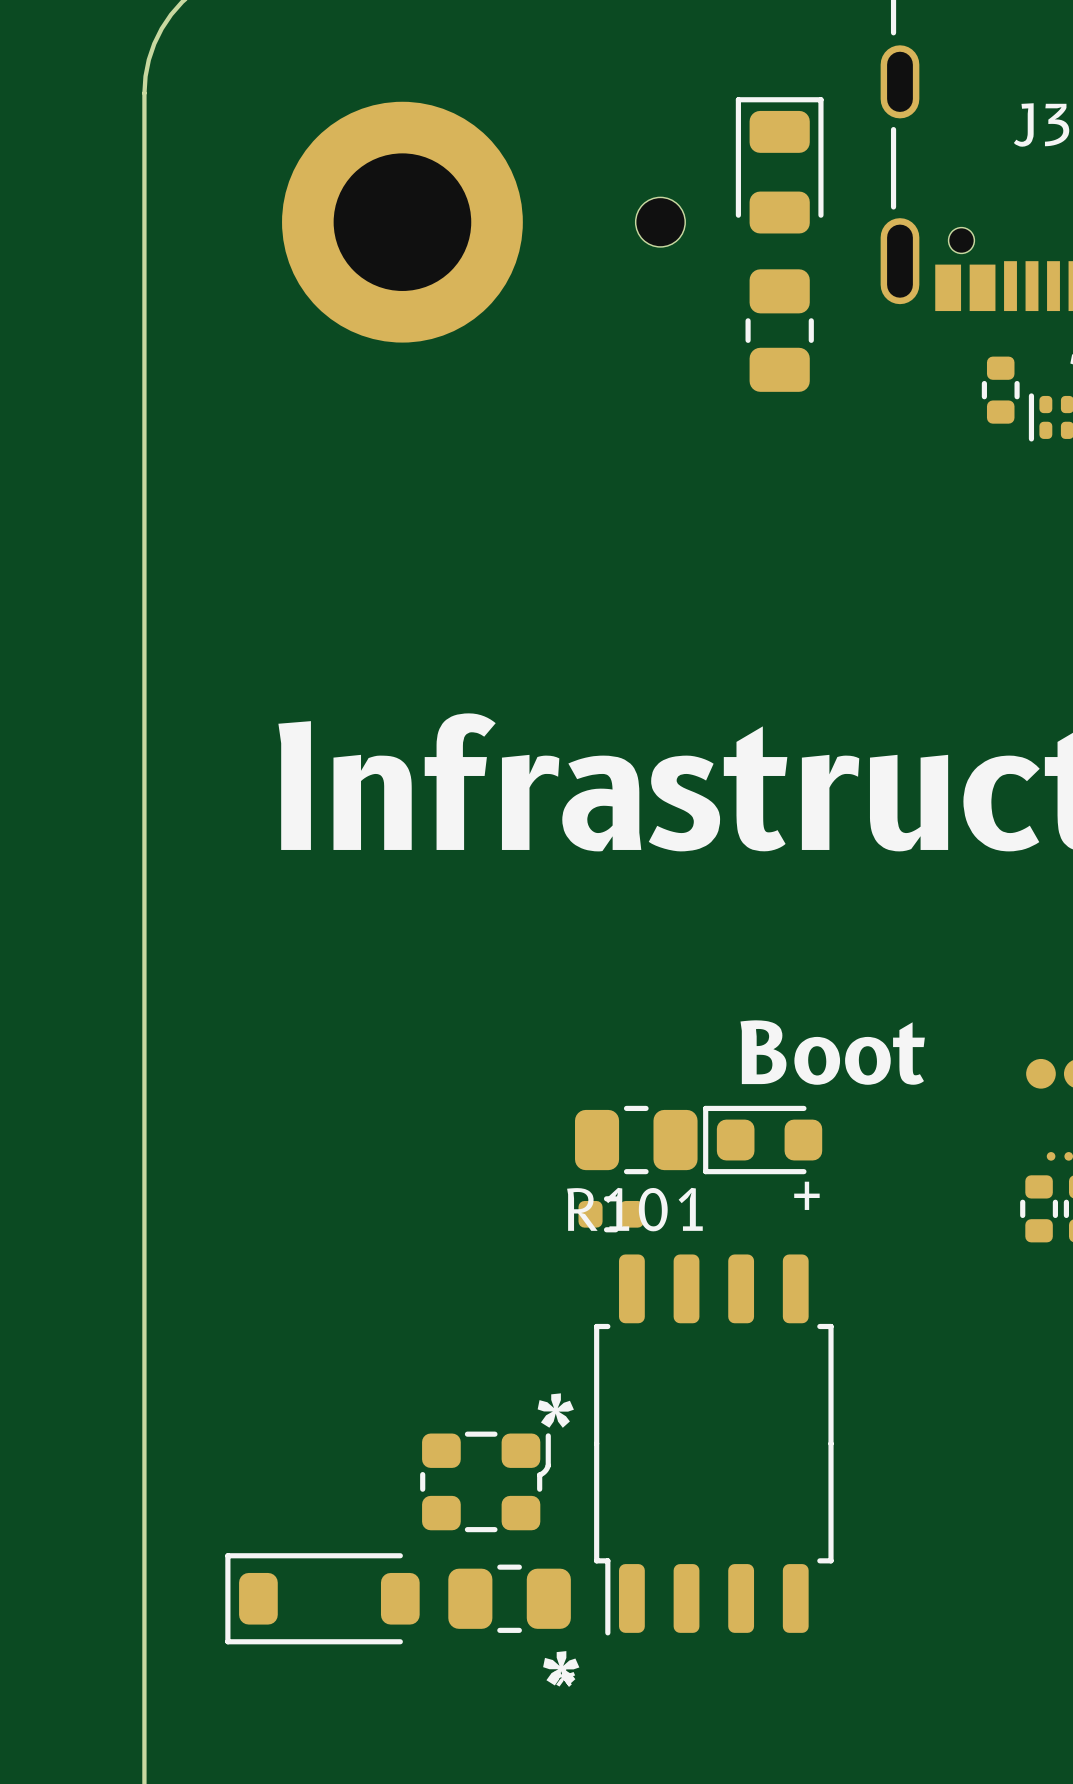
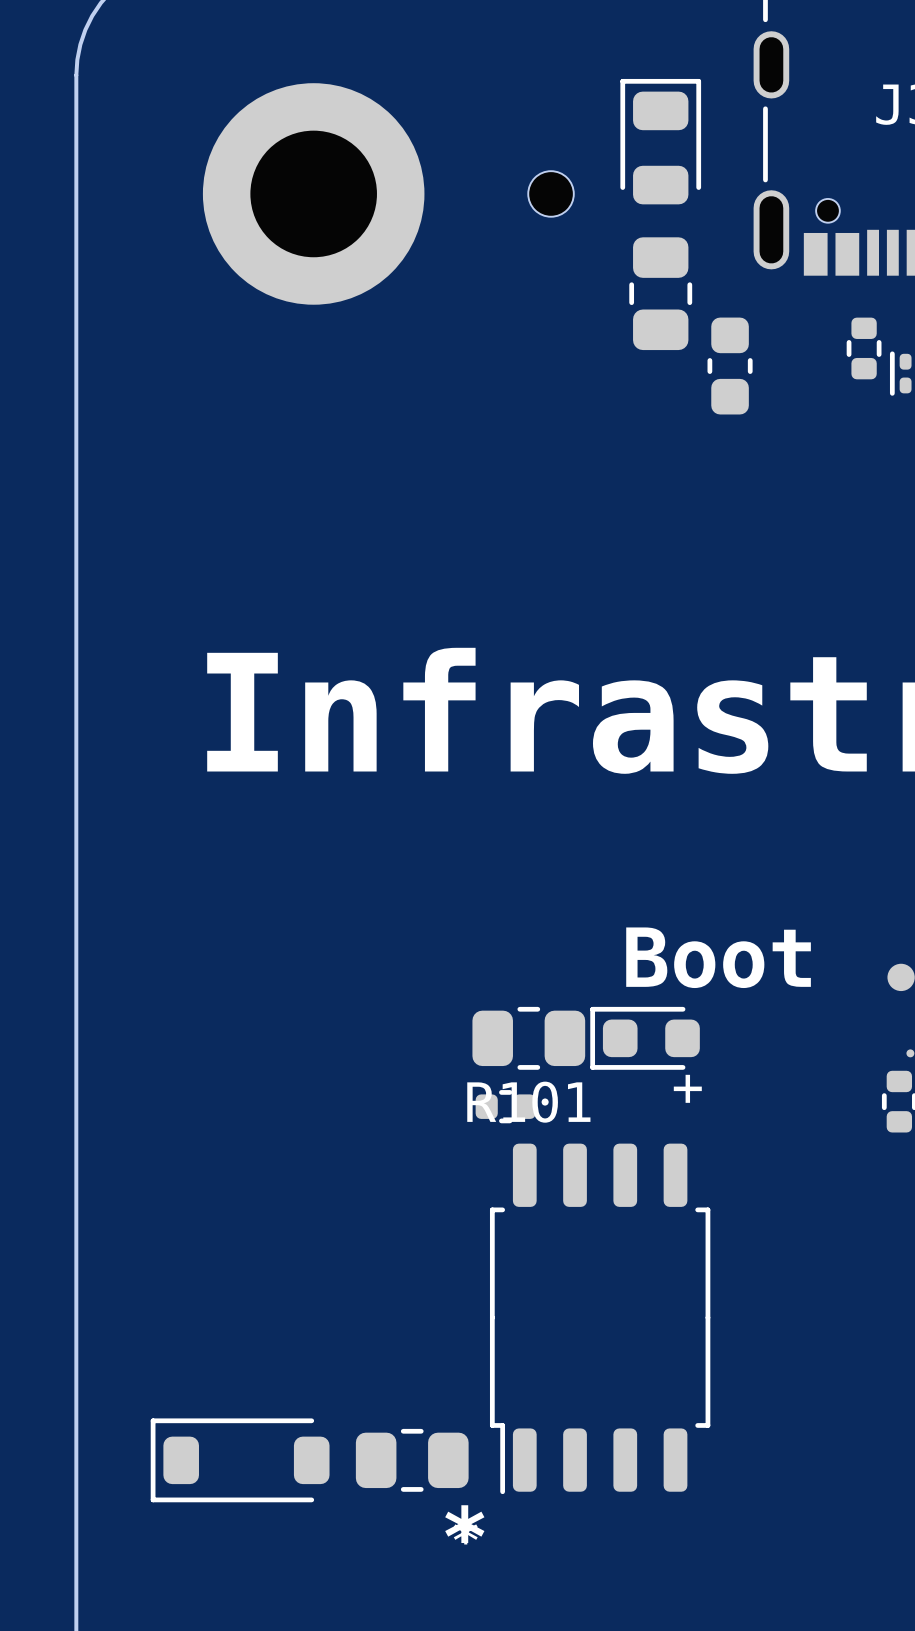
part: none -> (730, 366)
text: * (555, 1410) -> none
part: (485, 1481) -> none

